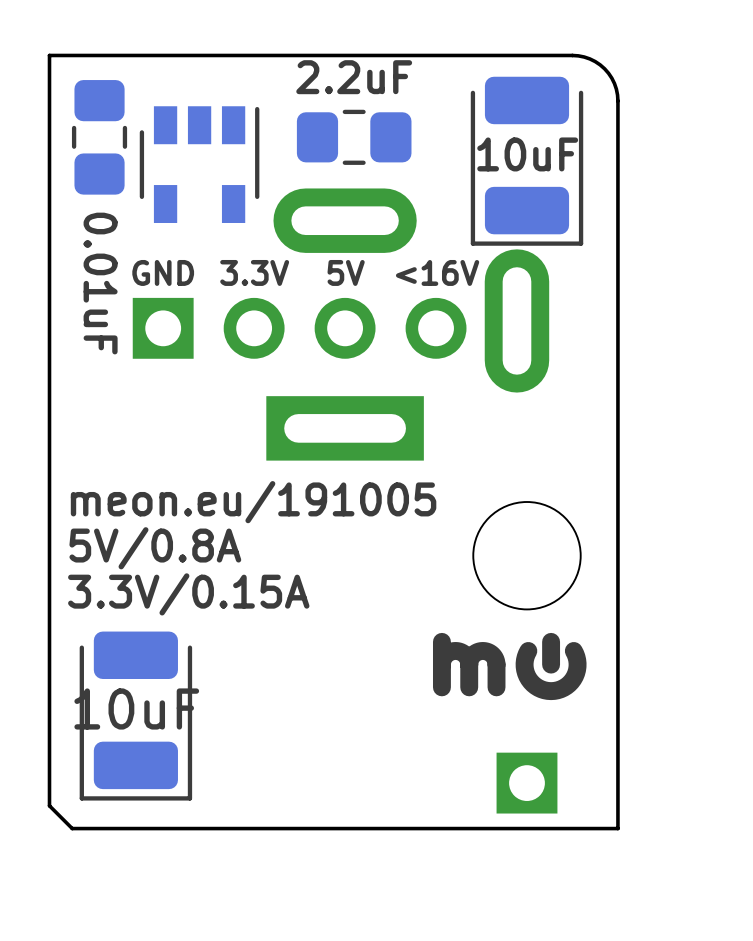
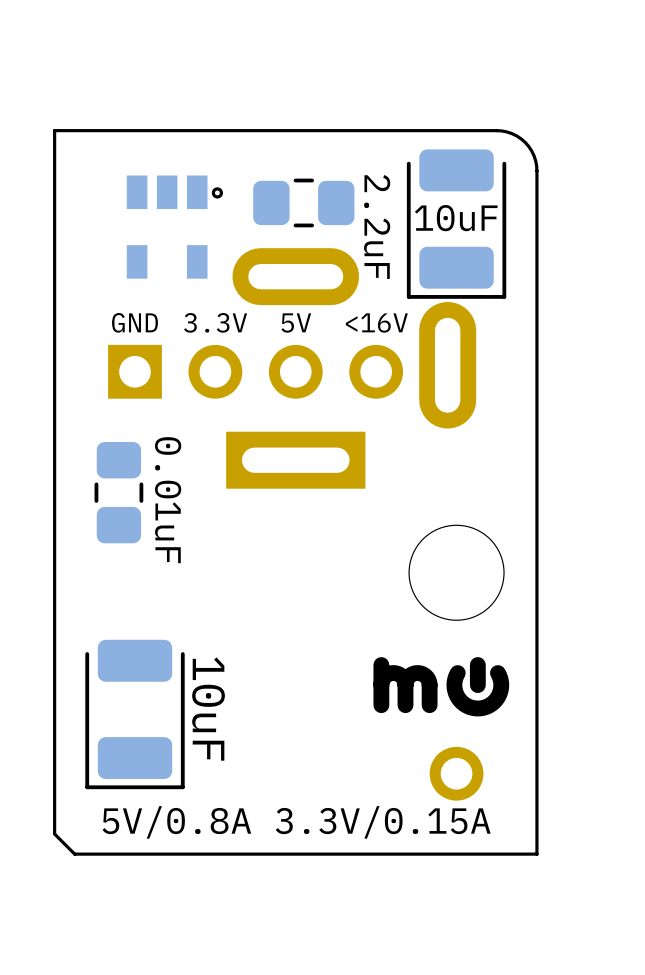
board edge: (72, 55) (49, 55) (49, 805) (72, 828) (617, 828) -> (54, 130) (54, 834) (74, 854) (536, 854) (536, 813)
part value rotation: 0° (354, 77) -> 90° clockwise (377, 227)
part footprint: [139, 106, 260, 223] -> [126, 175, 224, 279]
part position: (99, 137) -> (118, 492)
part value position: 0.01uF (100, 283) -> 0.01uF (168, 500)
text: meon.eu/191005 (253, 502) -> none
text: 5V/0.8A (155, 548) -> none
text: 3.3V/0.15A (188, 594) -> none
drawing position: (509, 666) -> (441, 686)
part value rotation: 0° (136, 708) -> 90° clockwise (208, 709)
part position: (135, 716) -> (135, 714)
part footprint: [496, 752, 558, 814] -> [429, 746, 484, 801]
text: none -> 5V/0.8A 3.3V/0.15A (296, 822)

